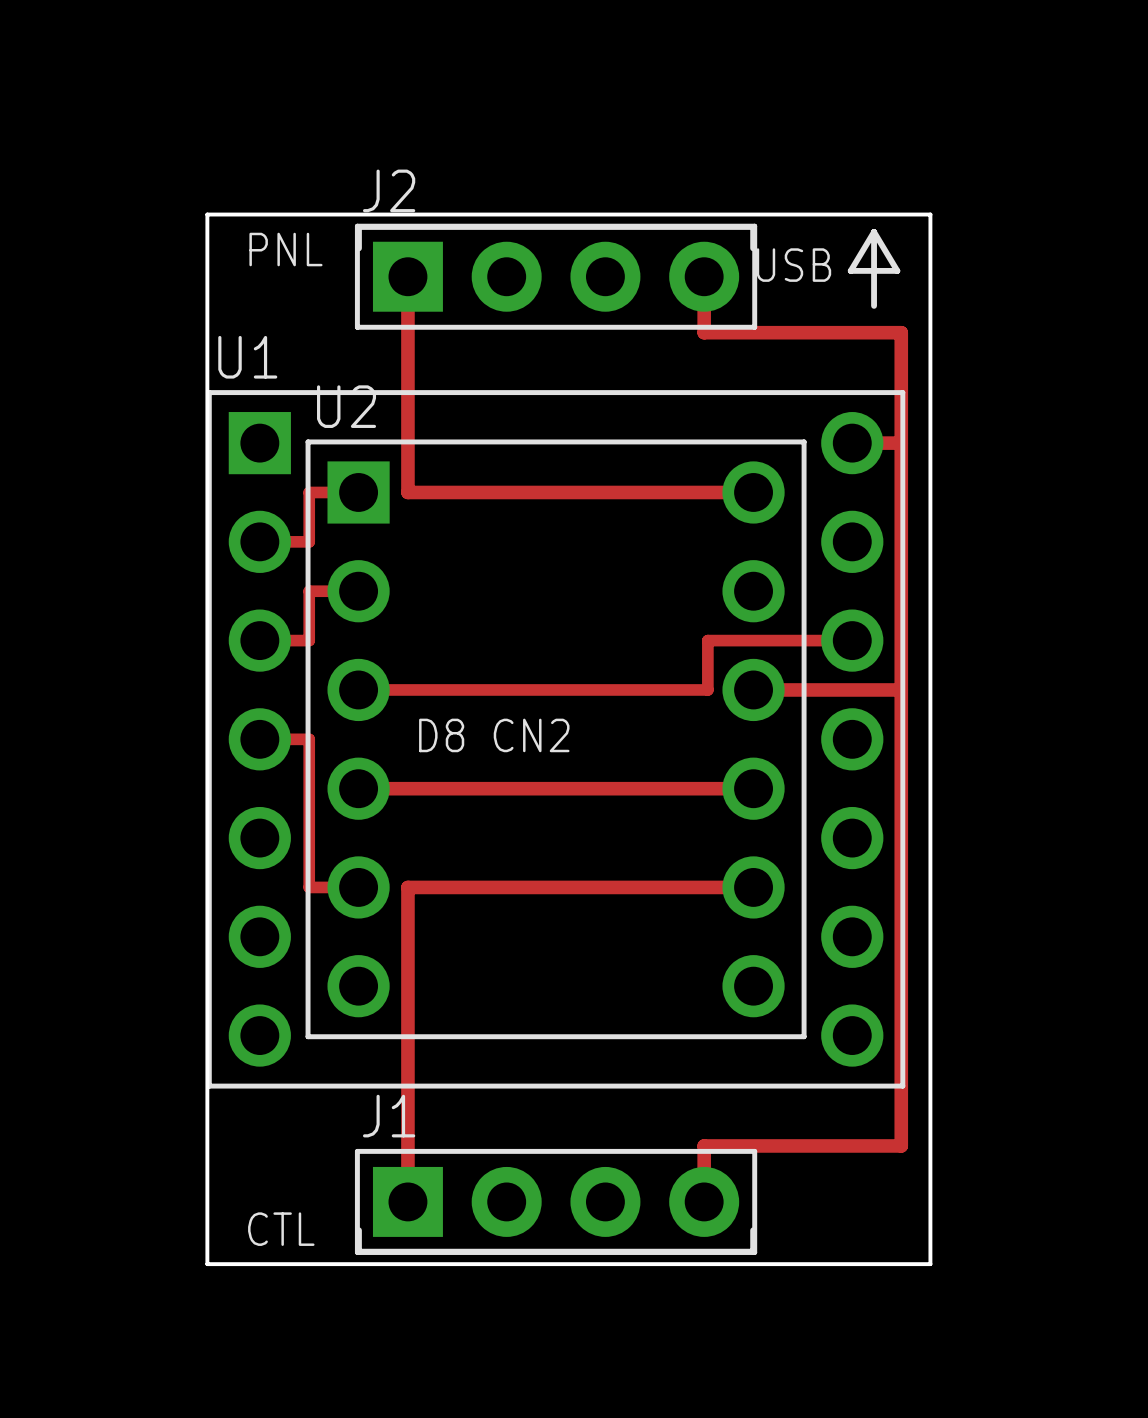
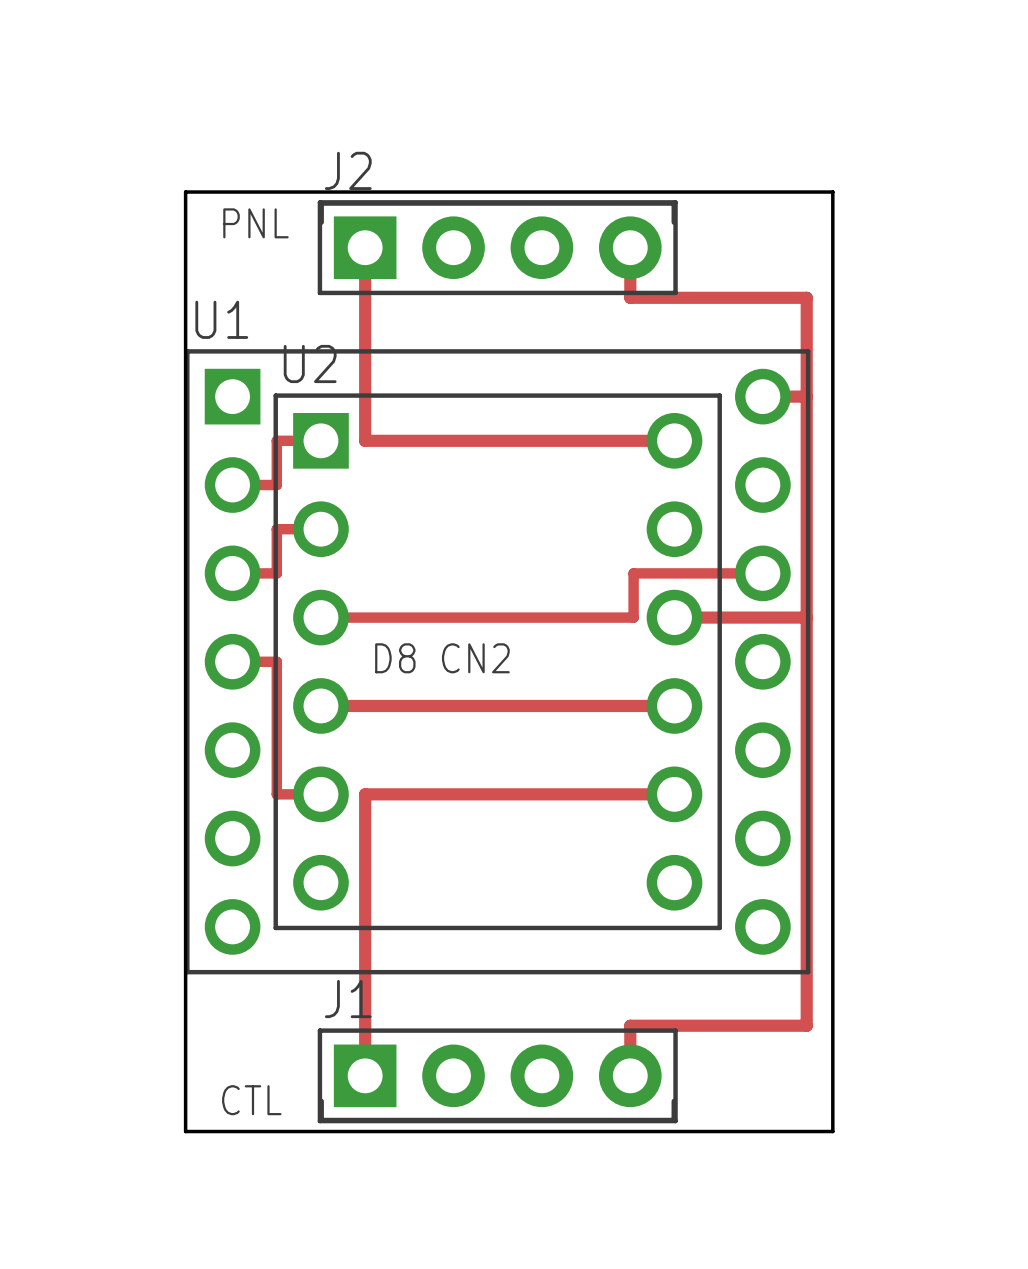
line: (874, 232) (850, 270) (897, 270) (874, 232) -> none
line: (874, 232) (874, 305) -> none
text: USB (793, 265) -> none

